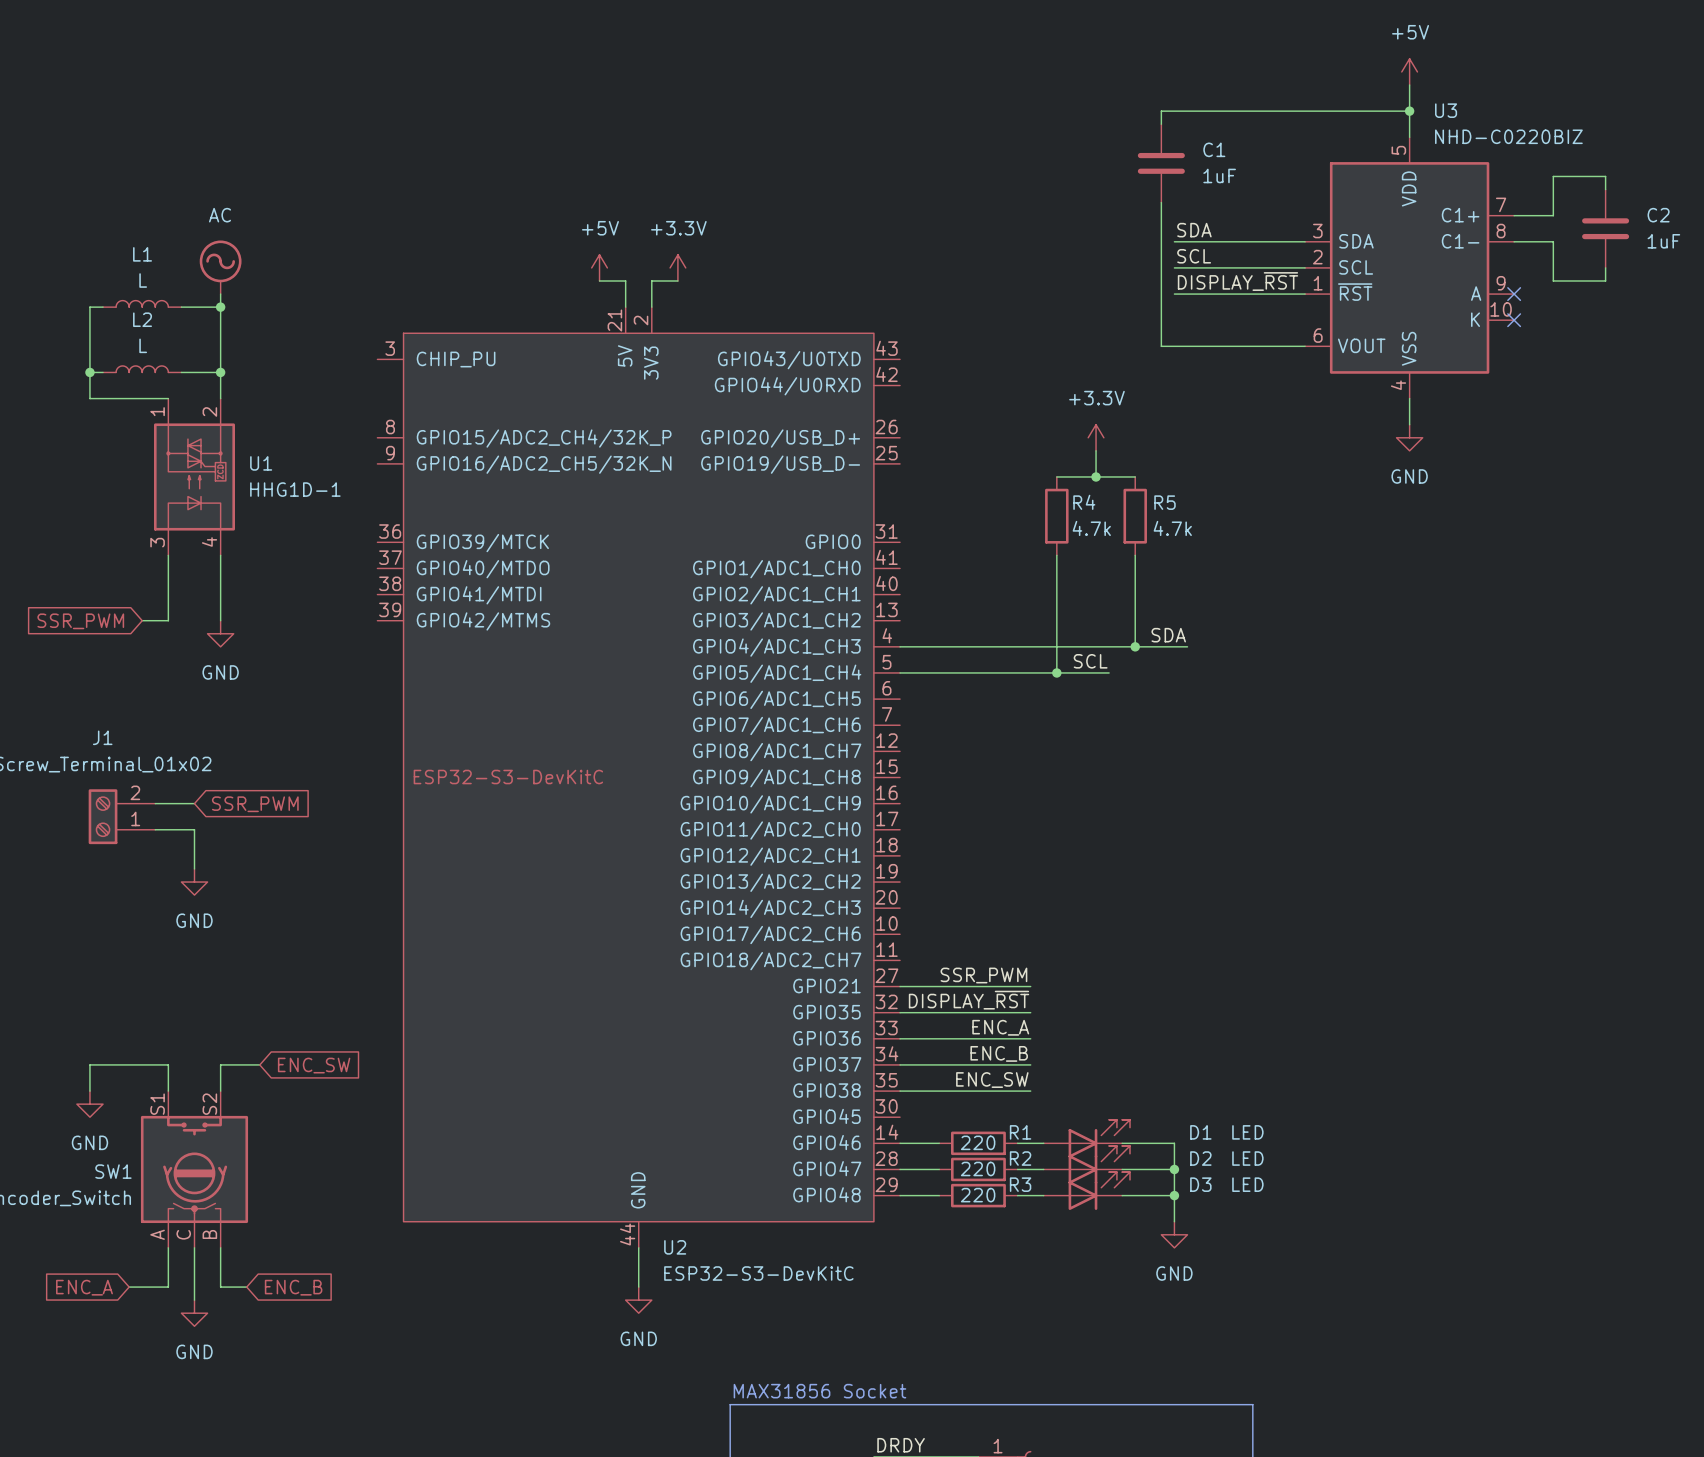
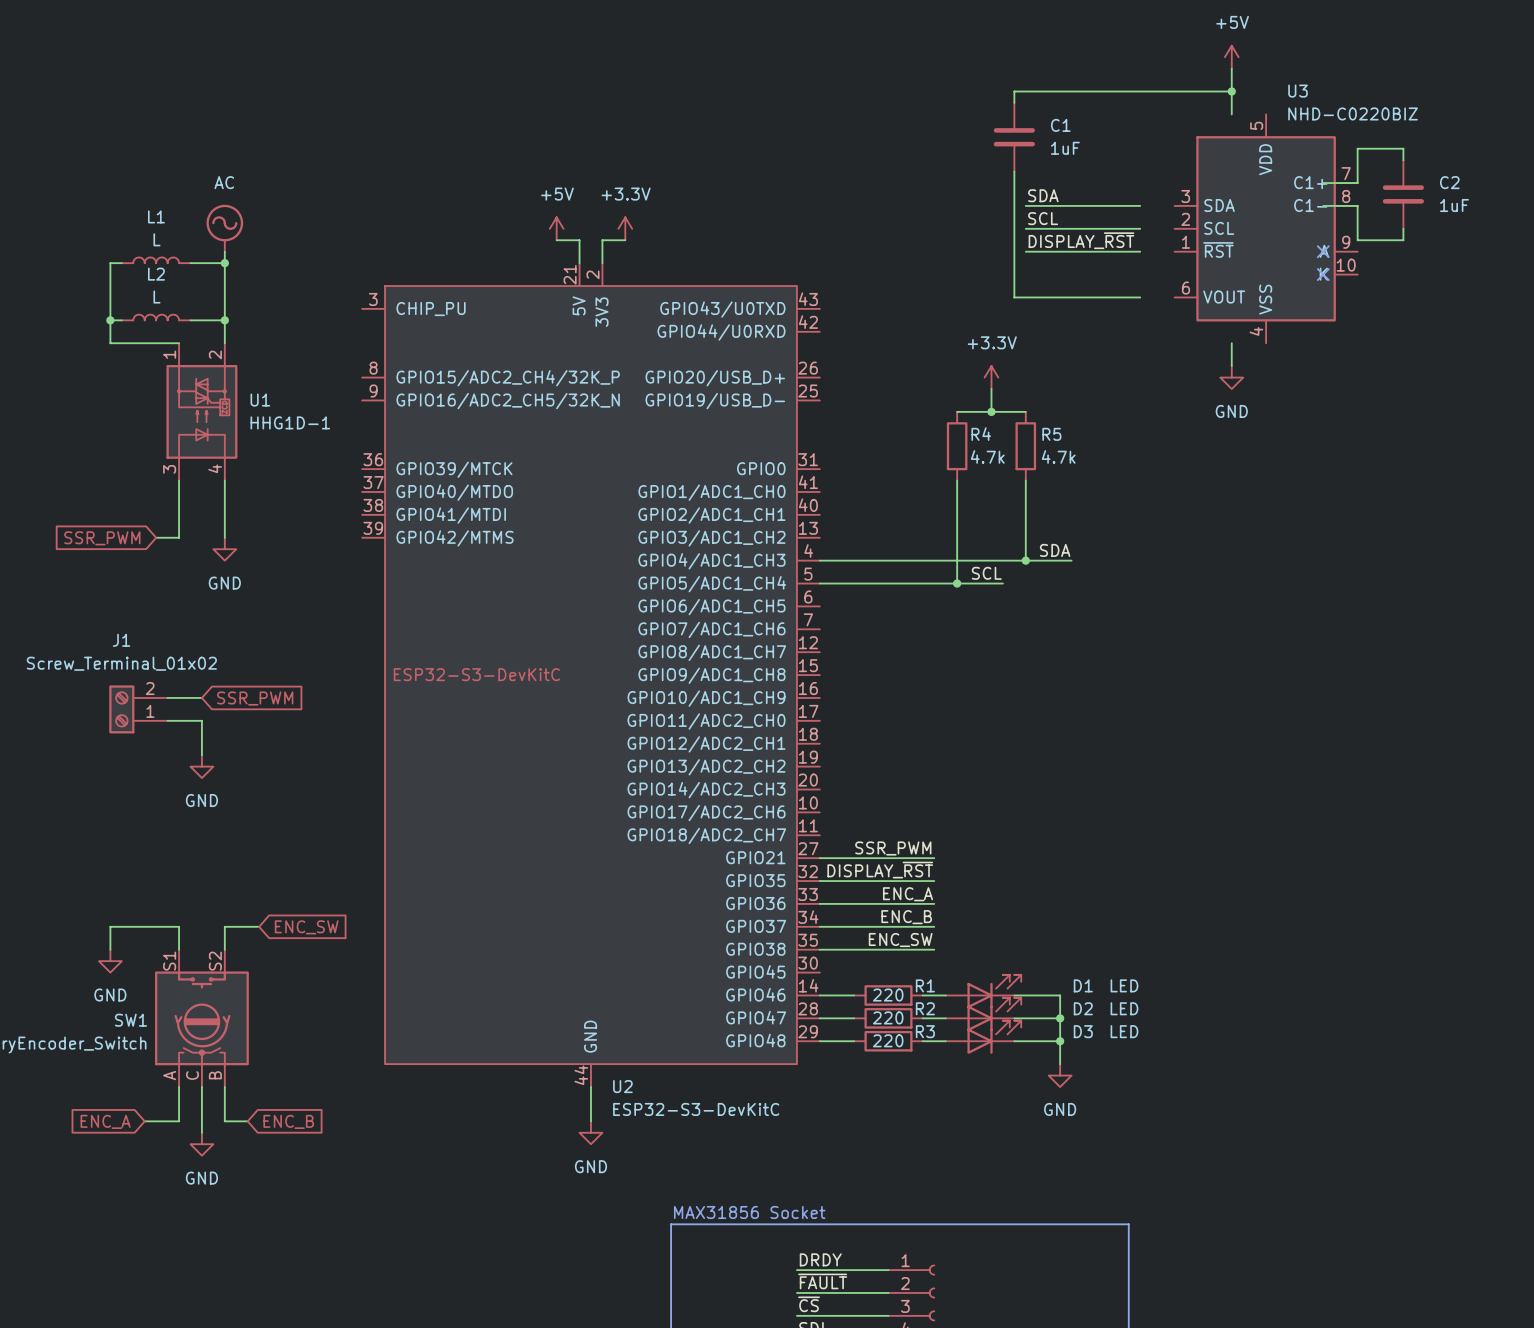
power symbol position: +5V (1409, 71) -> +5V (1231, 57)
wire: (1409, 85) (1409, 137) -> (1231, 68) (1231, 114)
wire: (1161, 111) (1161, 124) -> (1048, 91) (1014, 91) (1014, 102)
wire: (1370, 111) (1409, 111) -> none
junction position: (1409, 111) -> (1231, 91)
C1 position: (1161, 163) -> (1014, 137)
wire: (1553, 176) (1553, 215) (1514, 215) -> (1391, 148) (1357, 148) (1357, 183) (1323, 183)
wire: (1566, 176) (1605, 176) (1605, 189) -> (1403, 148) (1403, 160)
wire: (1161, 202) (1161, 346) -> (1014, 171) (1014, 297) (1048, 297)
C2 position: (1605, 228) -> (1403, 194)
label position: SDA (1194, 230) -> SDA (1043, 195)
wire: (1265, 241) (1305, 241) -> (1025, 205) (1060, 205)
wire: (1514, 241) (1553, 241) (1553, 280) -> (1323, 205) (1357, 205) (1357, 240) (1391, 240)
label position: SCL (1194, 256) -> SCL (1043, 218)
wire: (1265, 267) (1305, 267) -> (1025, 228) (1060, 228)
wire: (1605, 267) (1605, 280) (1566, 280) -> (1403, 228) (1403, 240)
label position: DISPLAY_~{RST} (1237, 281) -> DISPLAY_~{RST} (1081, 240)
wire: (1265, 294) (1305, 294) -> (1025, 251) (1060, 251)
no-connect mark: none -> (1323, 251)
no-connect mark: (1514, 294) -> none
no-connect mark: none -> (1323, 274)
no-connect mark: (1514, 320) -> none
wire: (1265, 346) (1305, 346) -> none
wire: (1409, 398) (1409, 424) -> (1231, 343) (1231, 366)
power symbol position: GND (1409, 437) -> GND (1231, 377)

